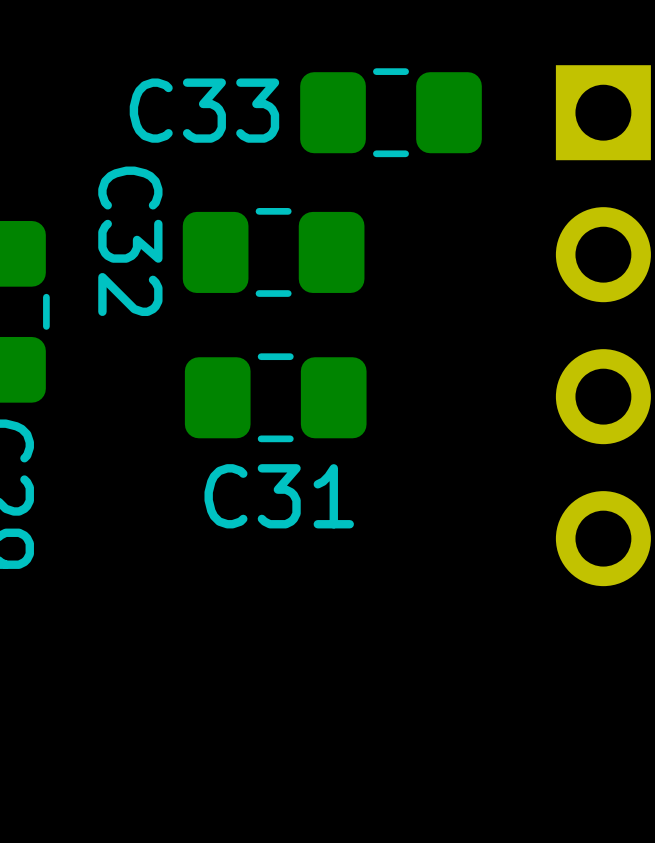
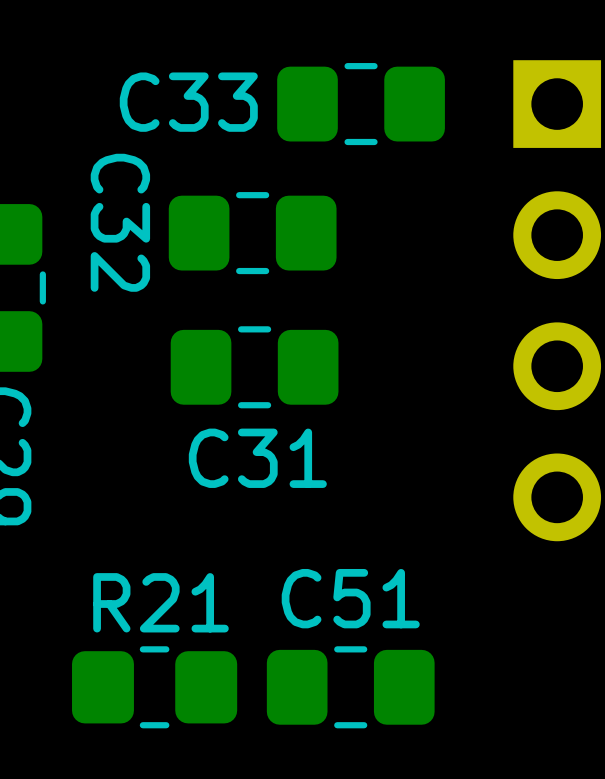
R21: none -> (154, 687)
C51: none -> (350, 687)

